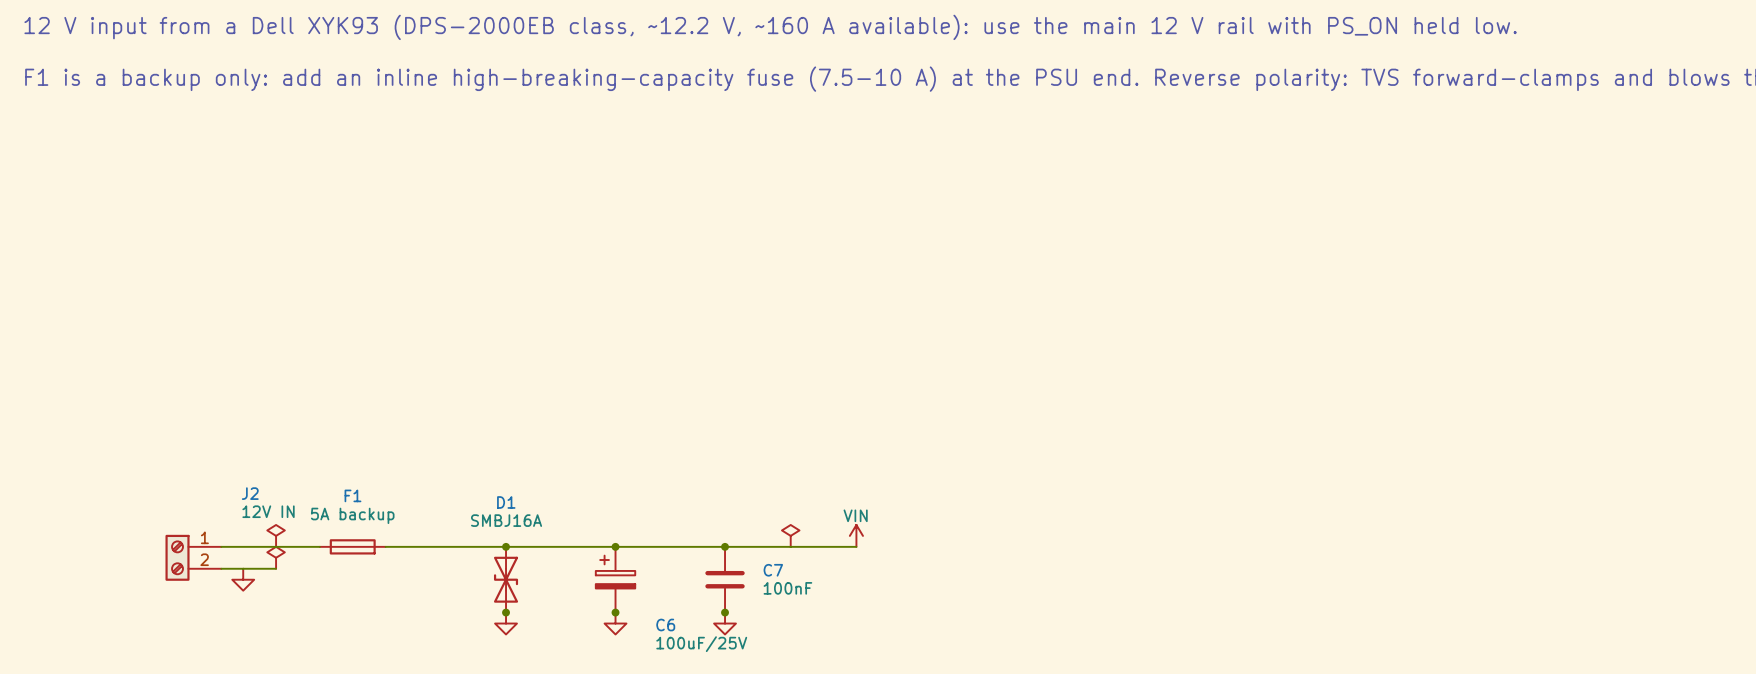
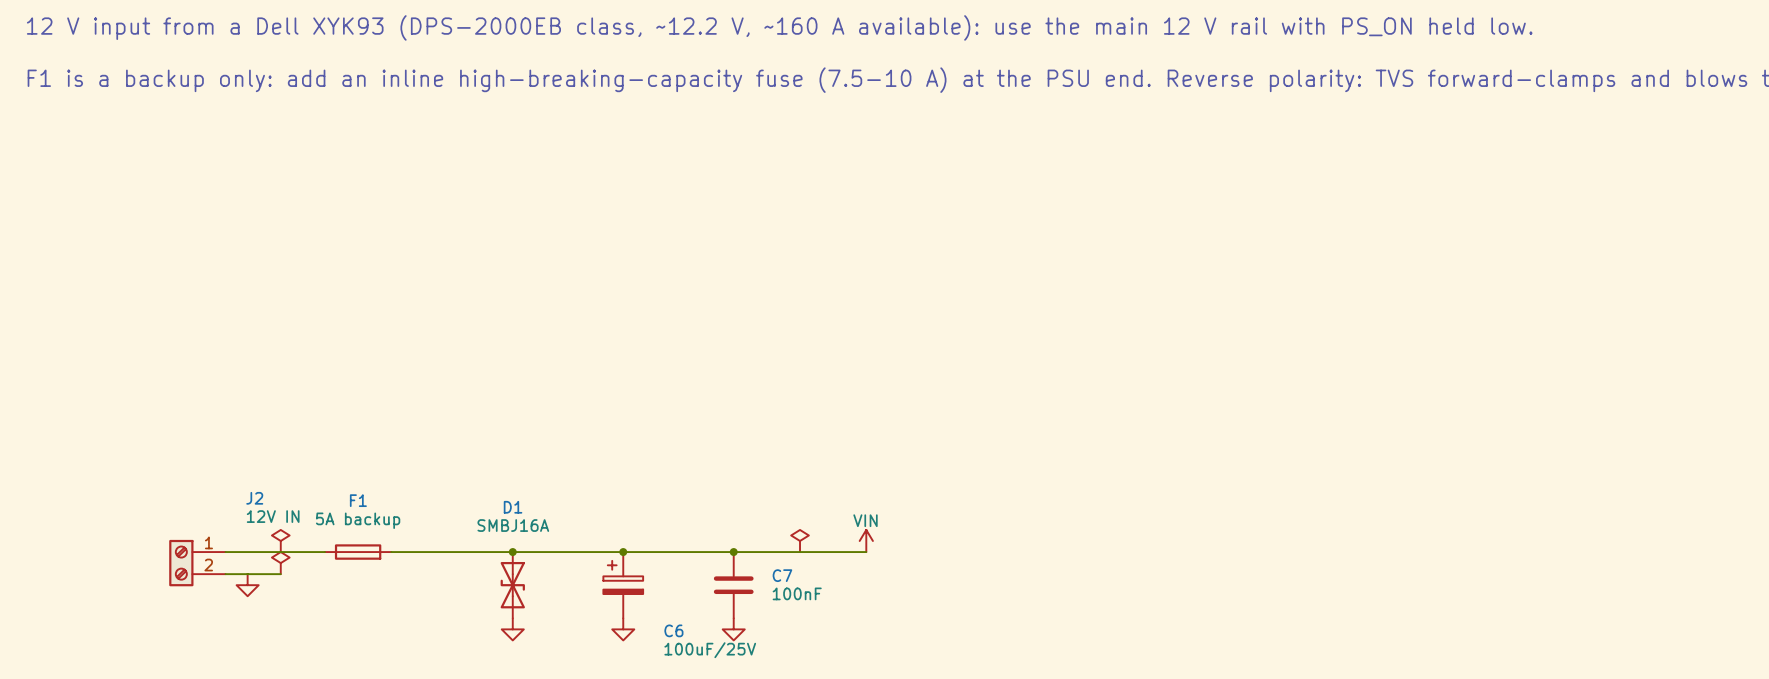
junction: (506, 612) -> none
junction: (615, 612) -> none
junction: (725, 612) -> none

